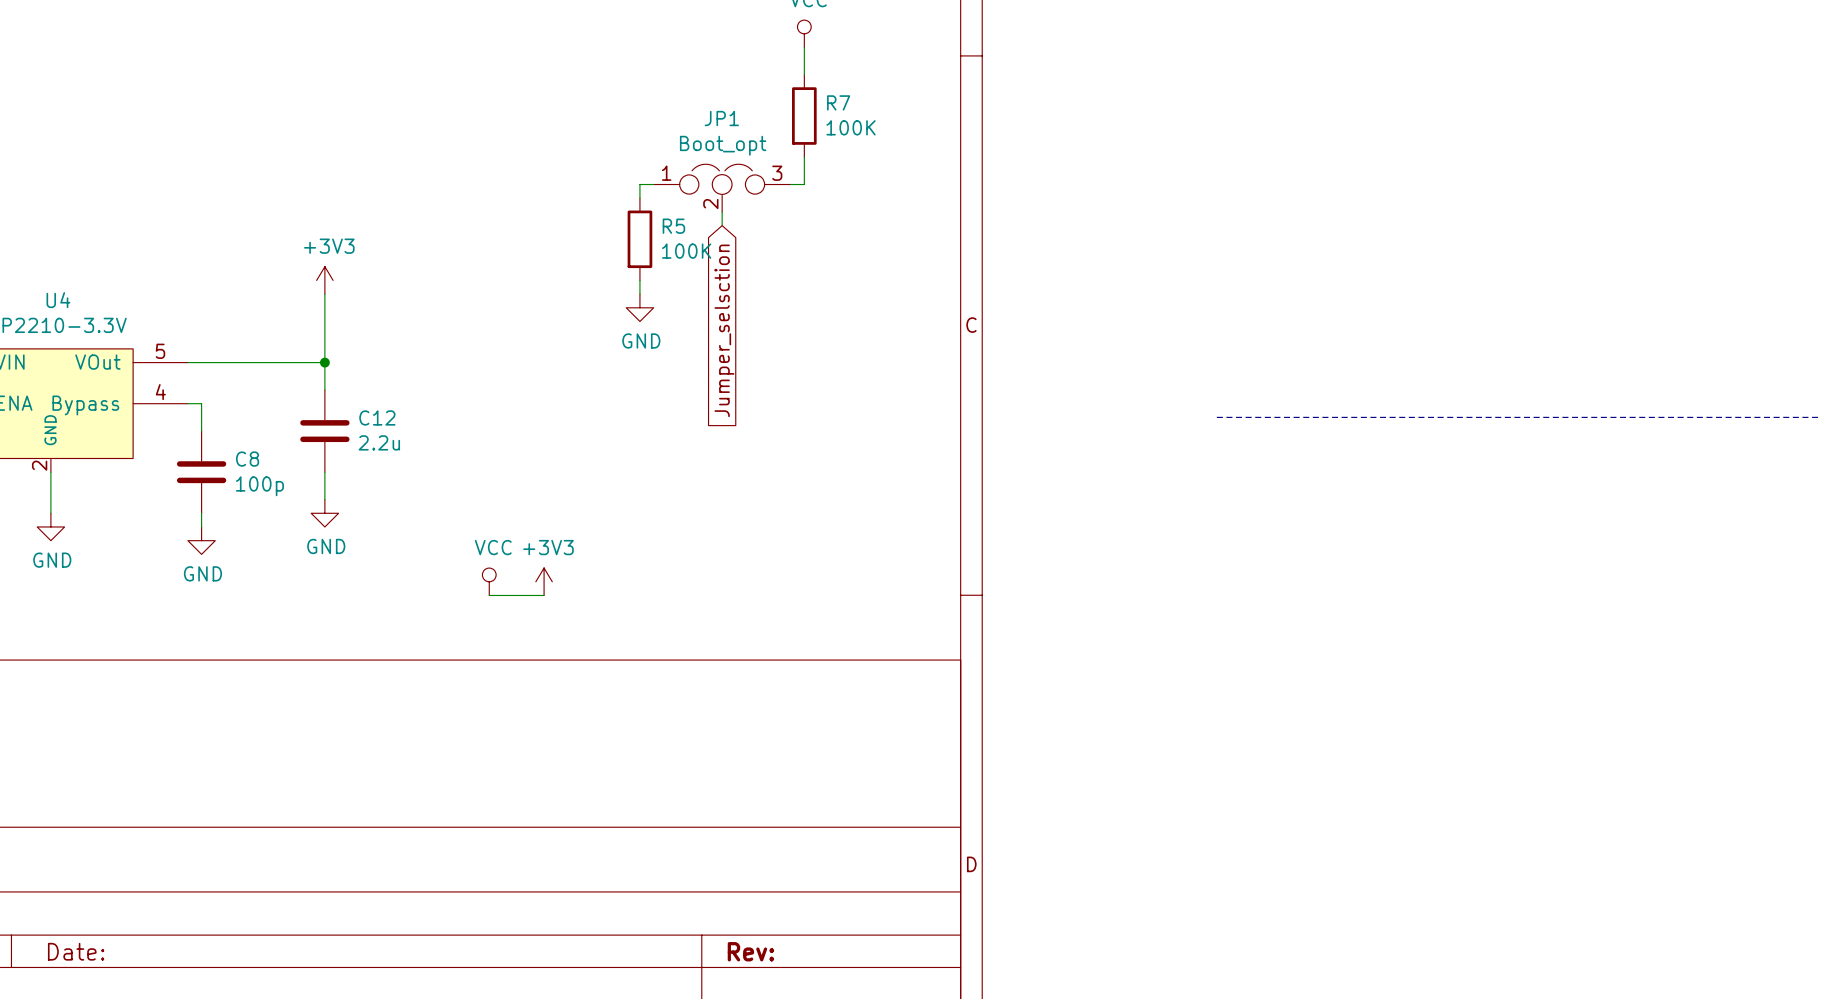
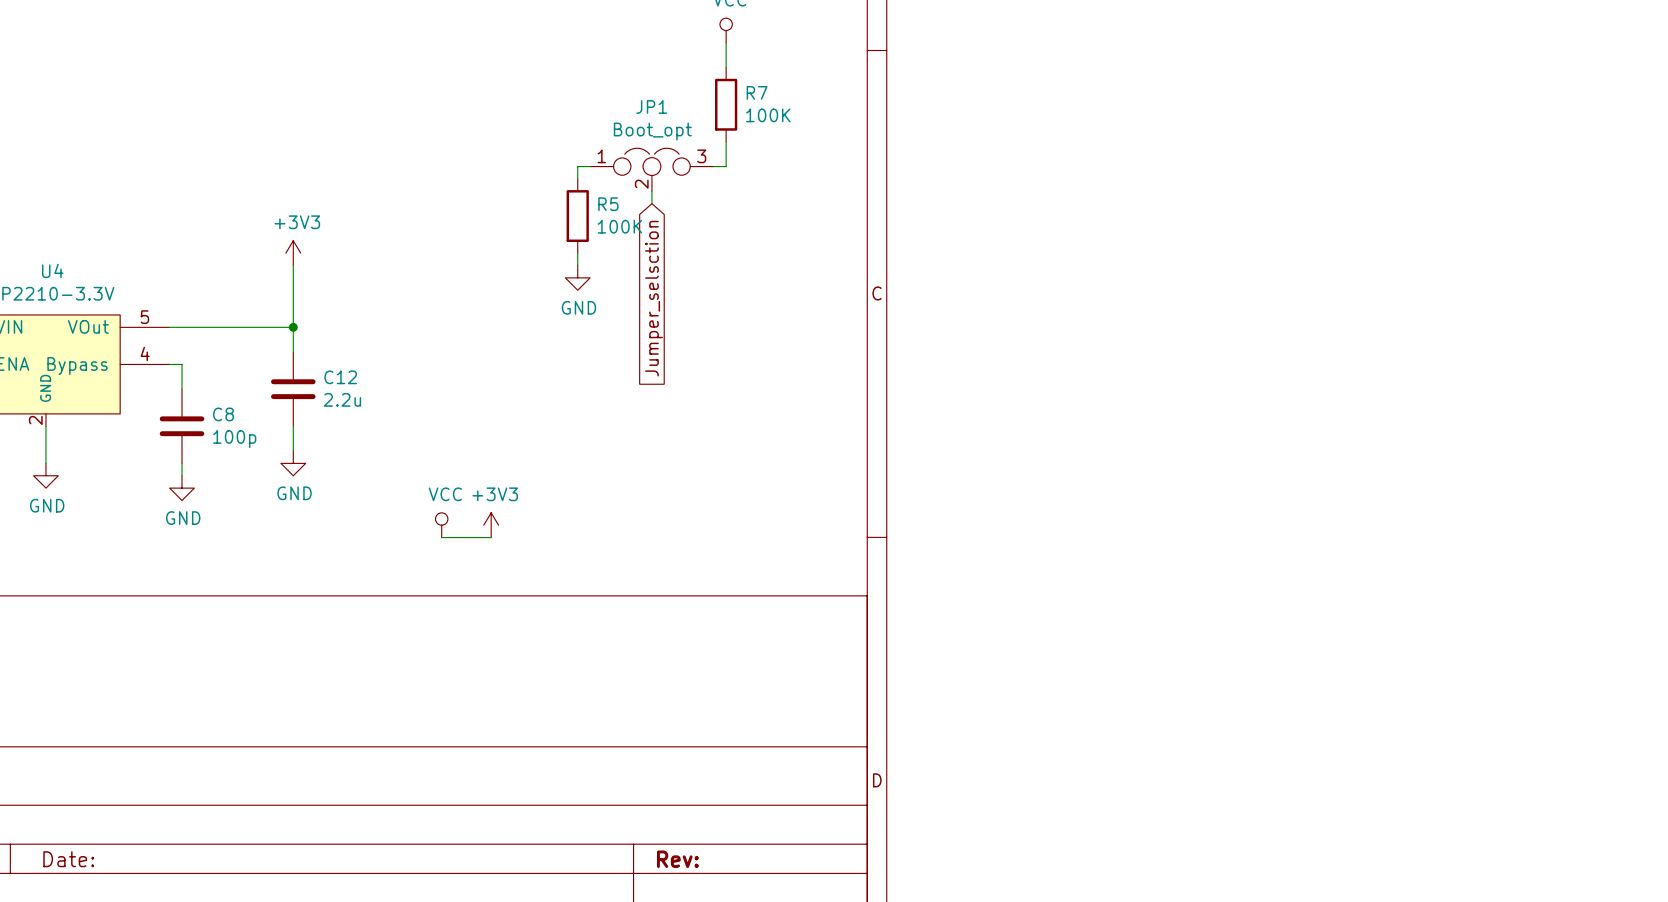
line: (1215, 417) (1818, 417) -> none

